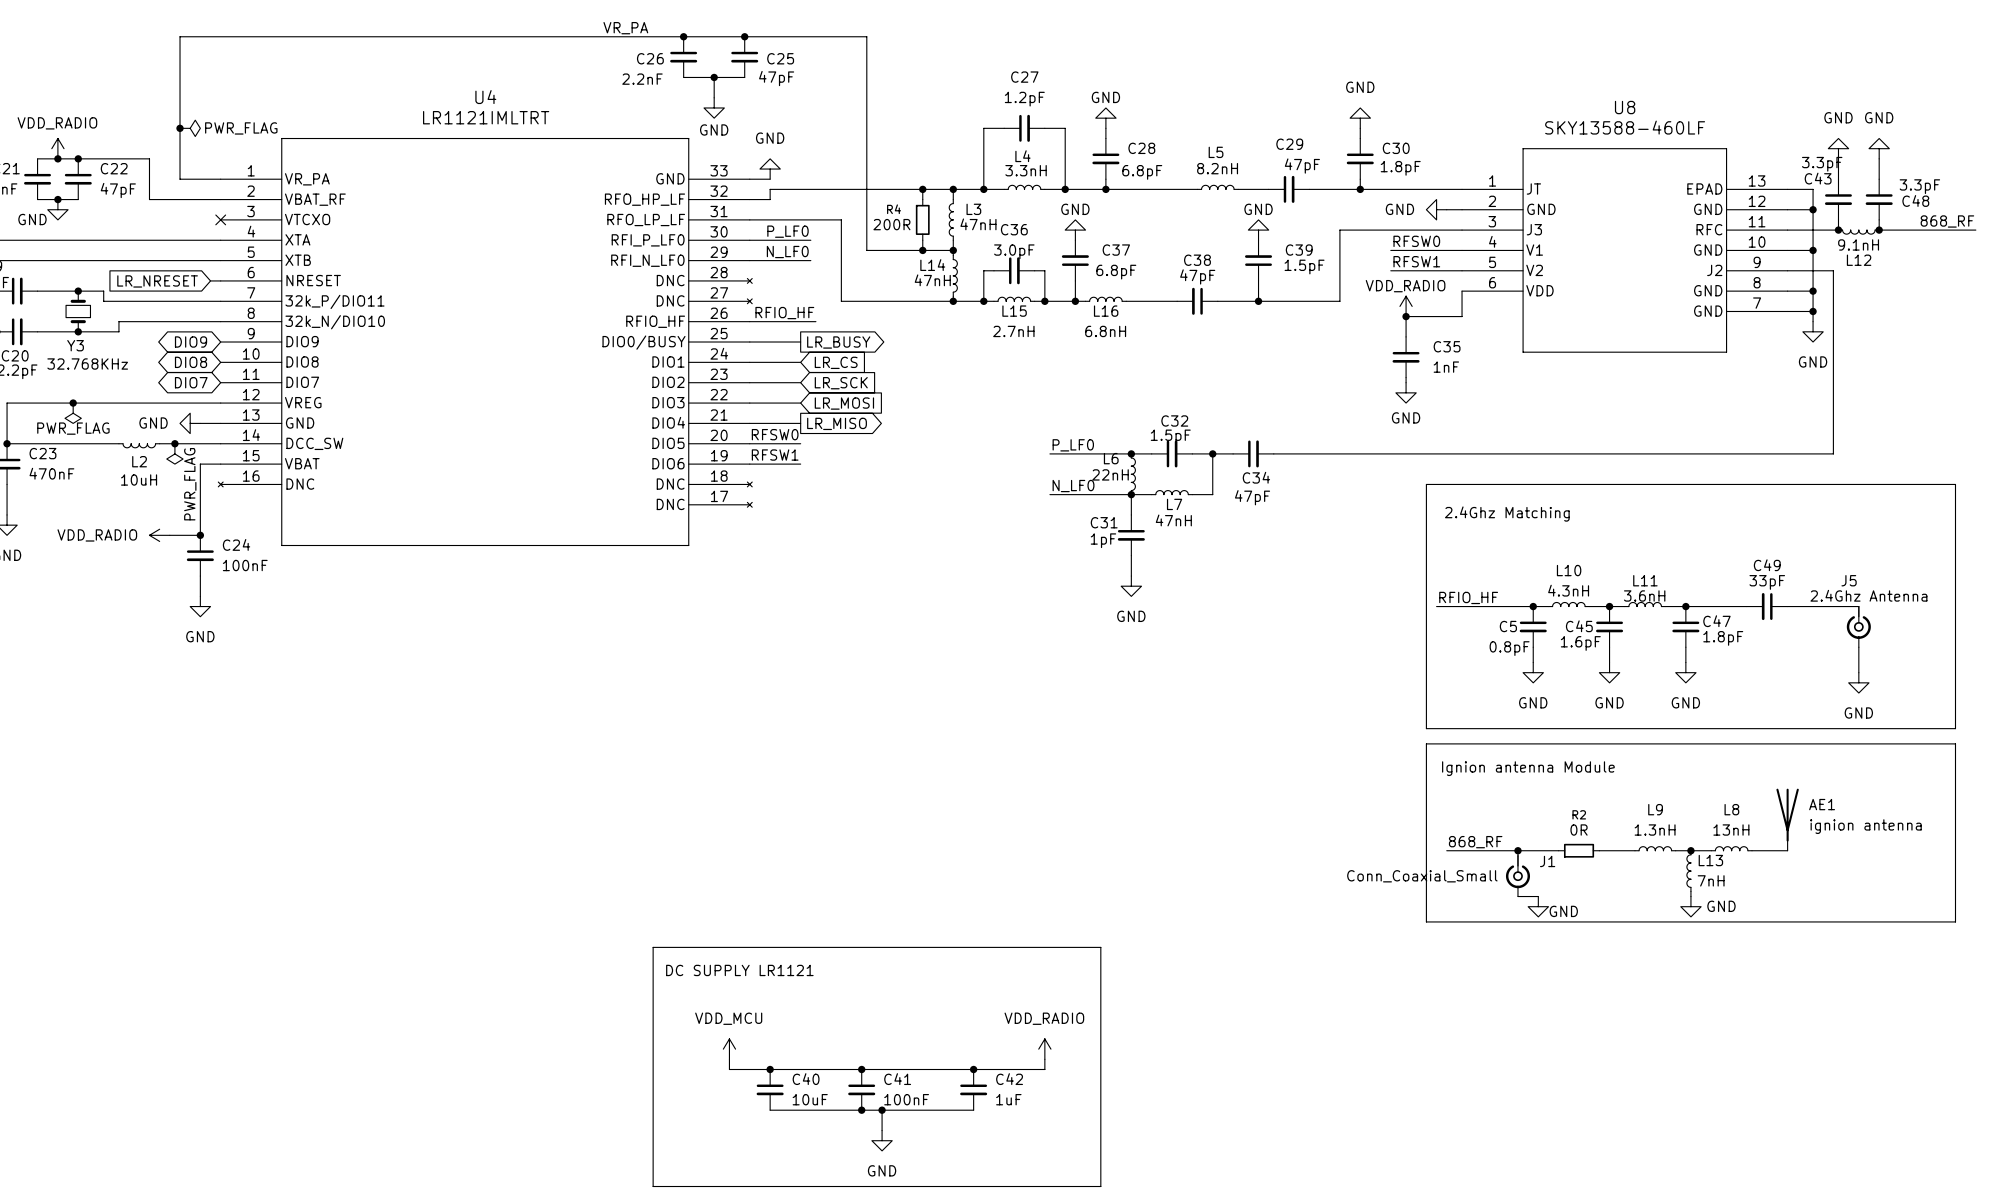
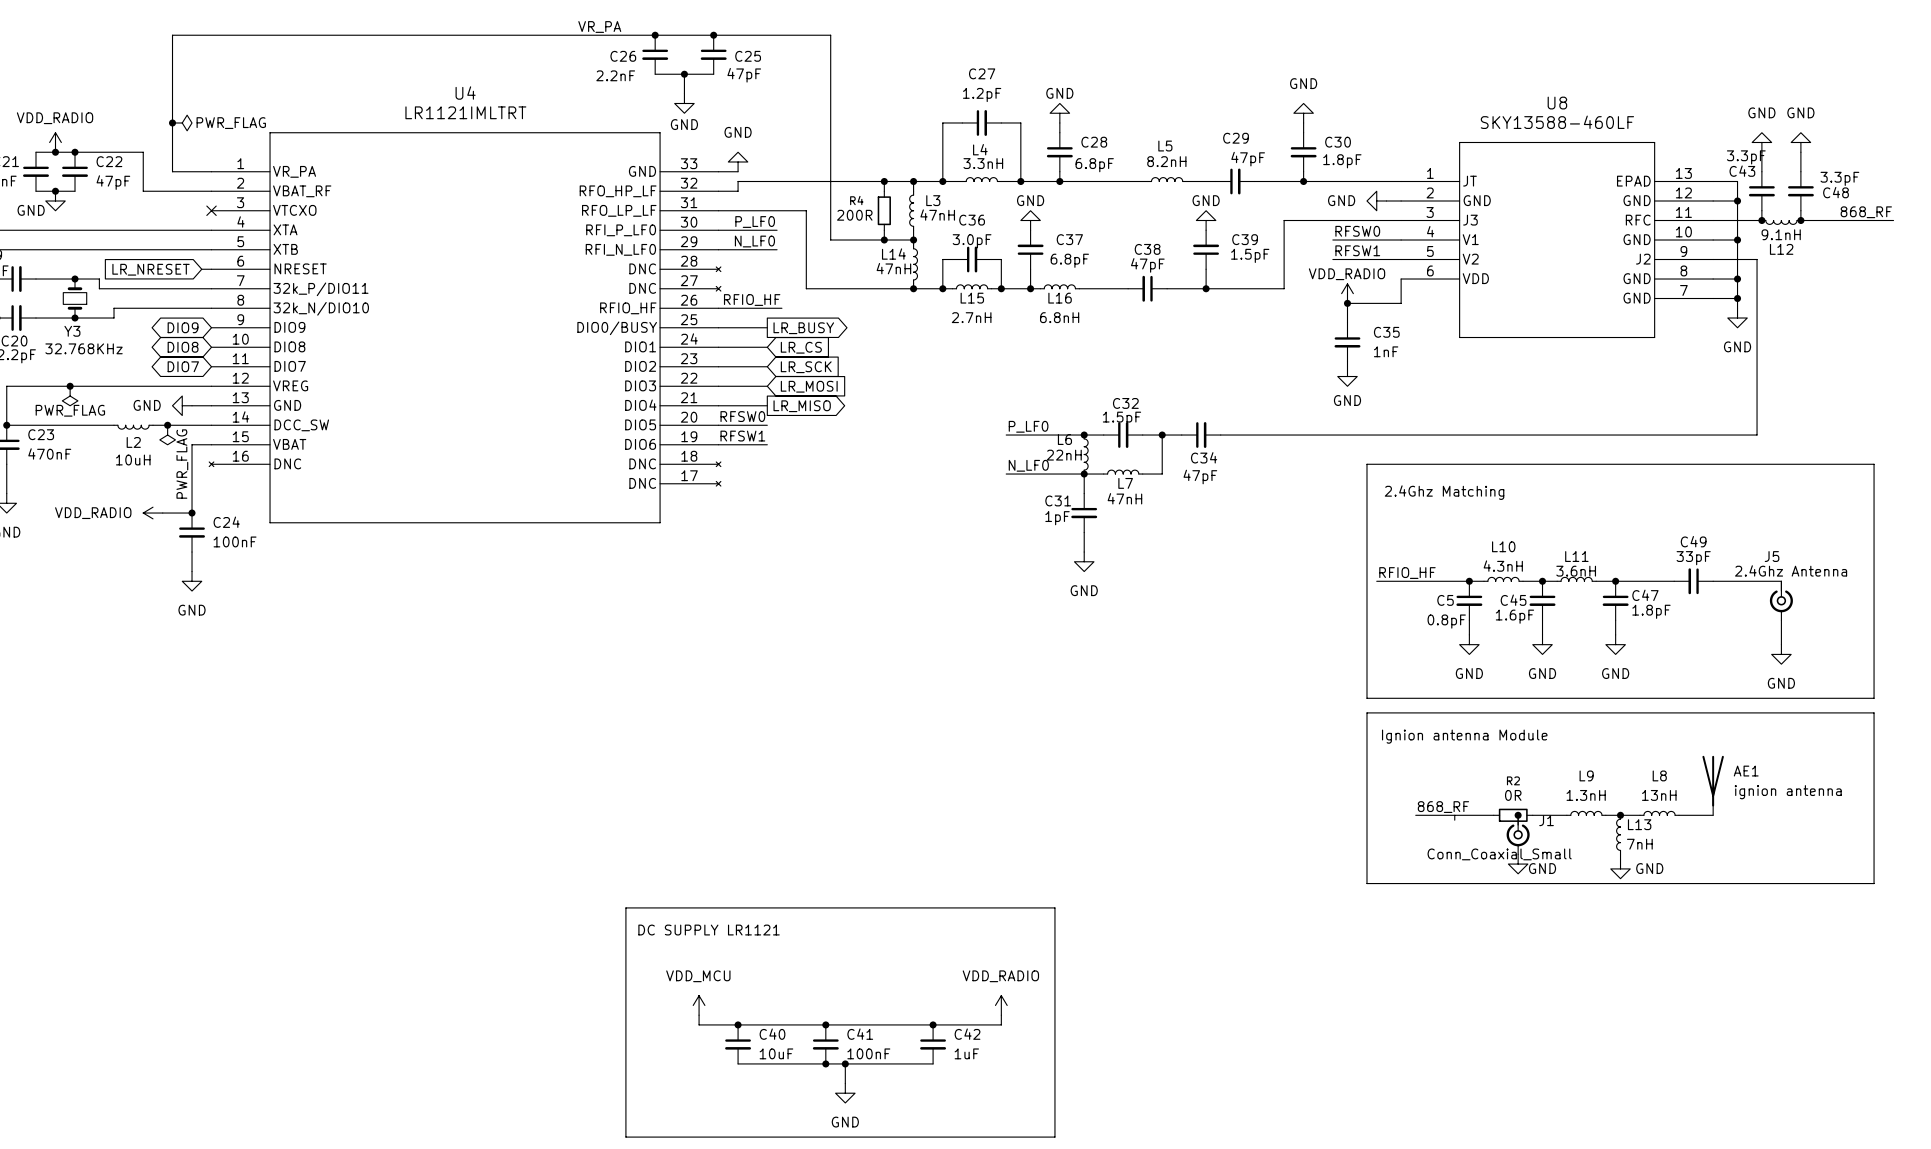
label position: 868_RF (1475, 842) -> 868_RF (1443, 807)
wire: (1446, 850) (1477, 850) -> none
junction: (1517, 850) -> none
junction: none -> (1518, 815)
J1 value position: Conn_Coaxial_Small (1422, 876) -> Conn_Coaxial_Small (1499, 854)
J1 position: (1517, 876) -> (1518, 834)
wire: (1517, 896) (1538, 896) -> none
power symbol position: GND (1538, 906) -> GND (1518, 864)

